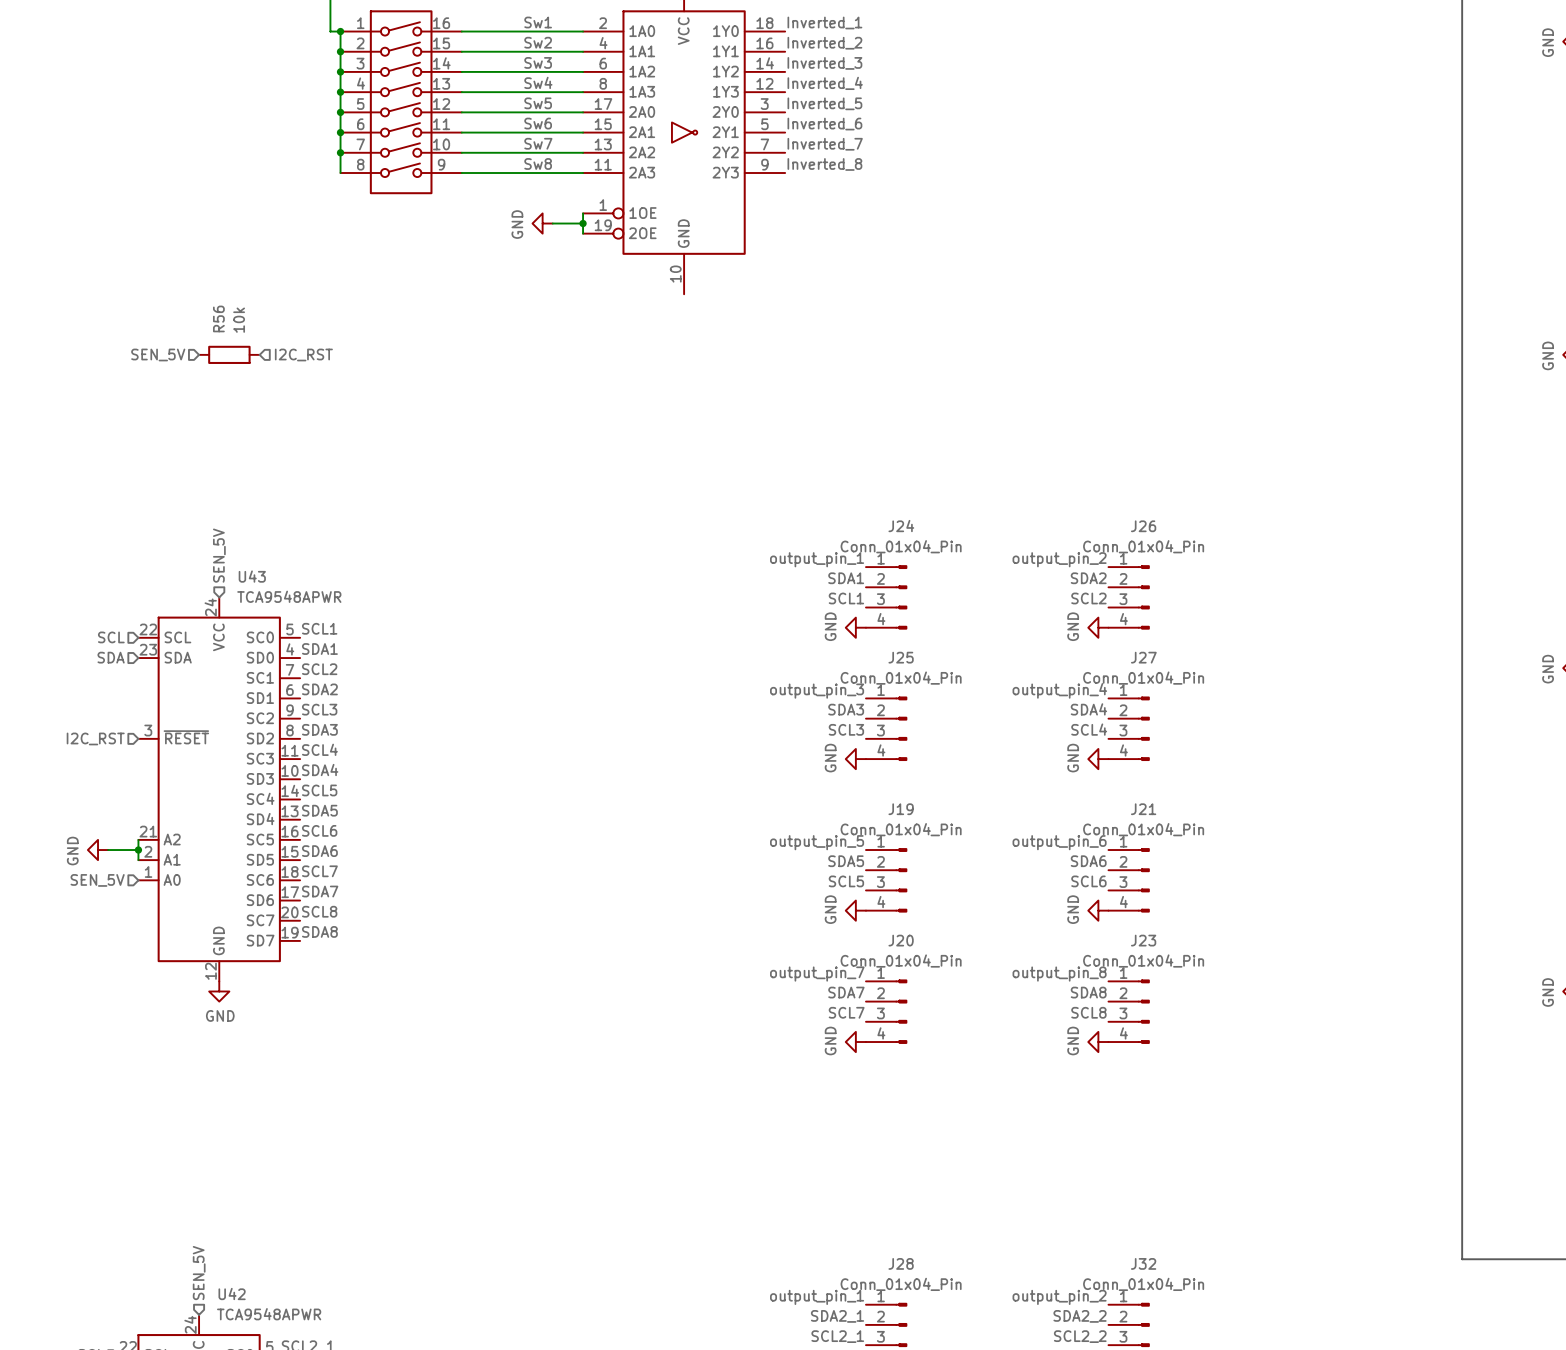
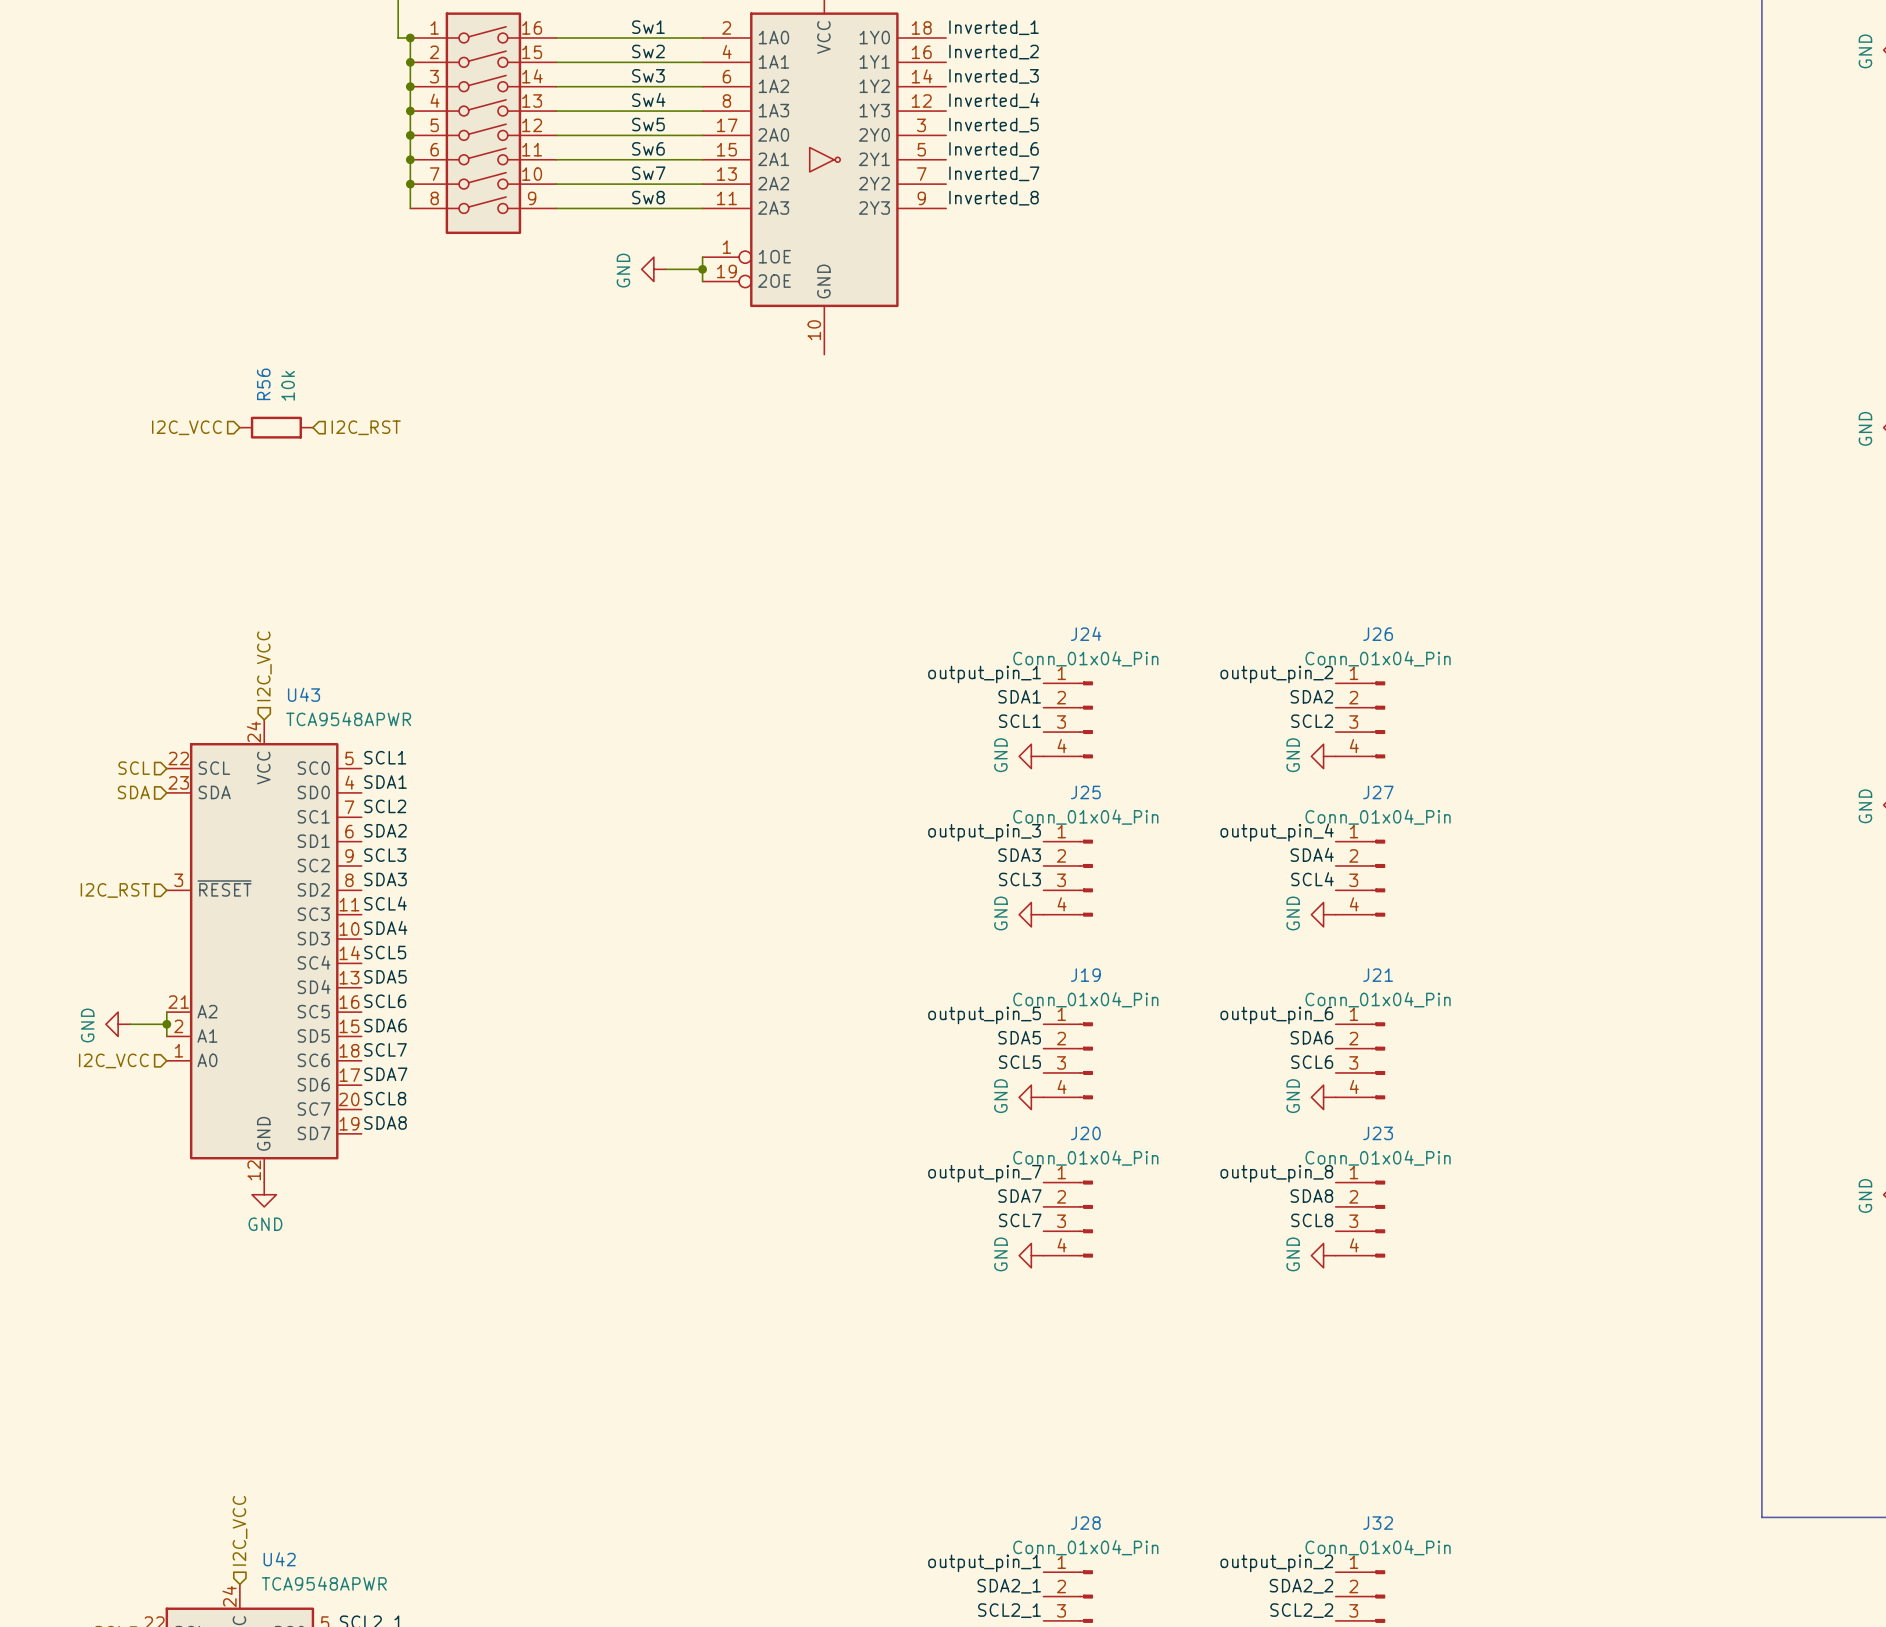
hierarchical label: SEN_5V (158, 354) -> I2C_VCC (186, 427)
hierarchical label: SEN_5V (219, 555) -> I2C_VCC (264, 666)
hierarchical label: SEN_5V (97, 880) -> I2C_VCC (113, 1060)
hierarchical label: SEN_5V (199, 1273) -> I2C_VCC (240, 1530)

